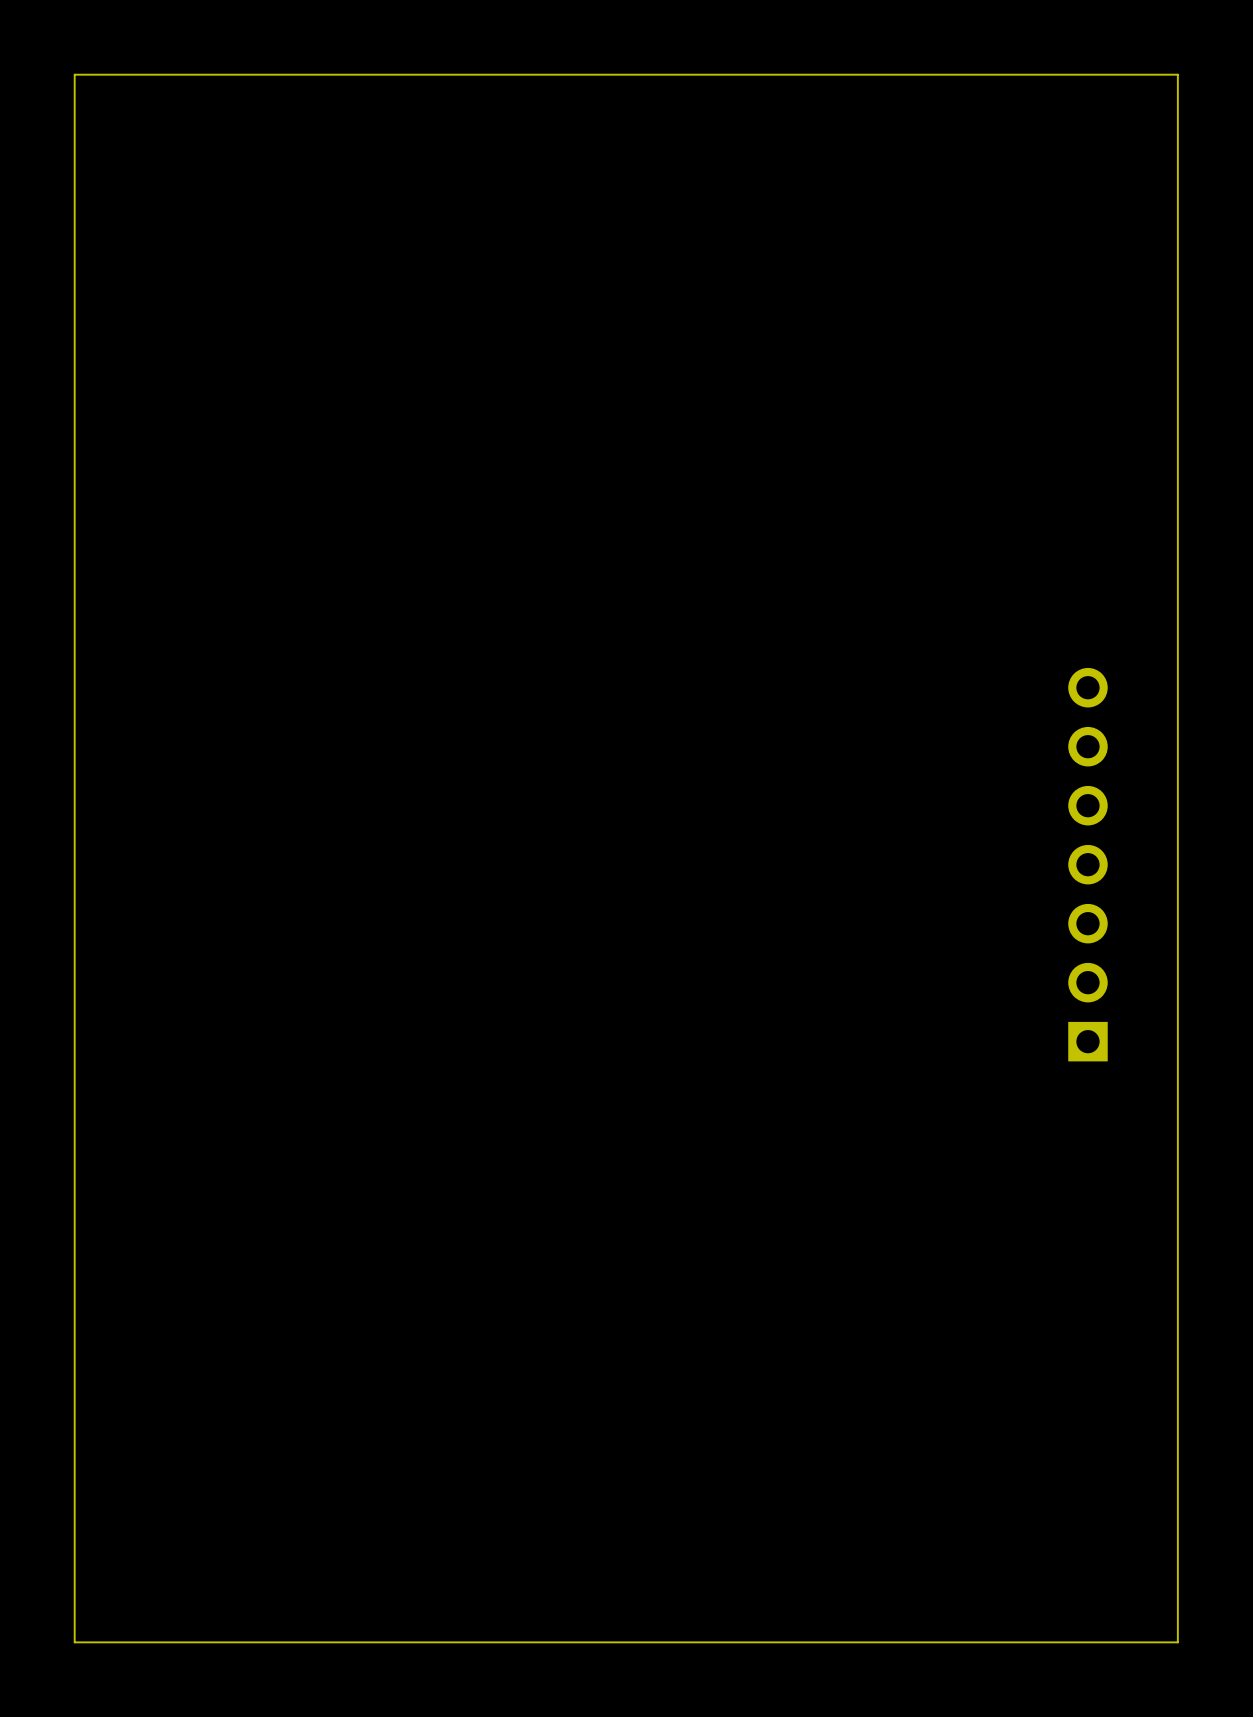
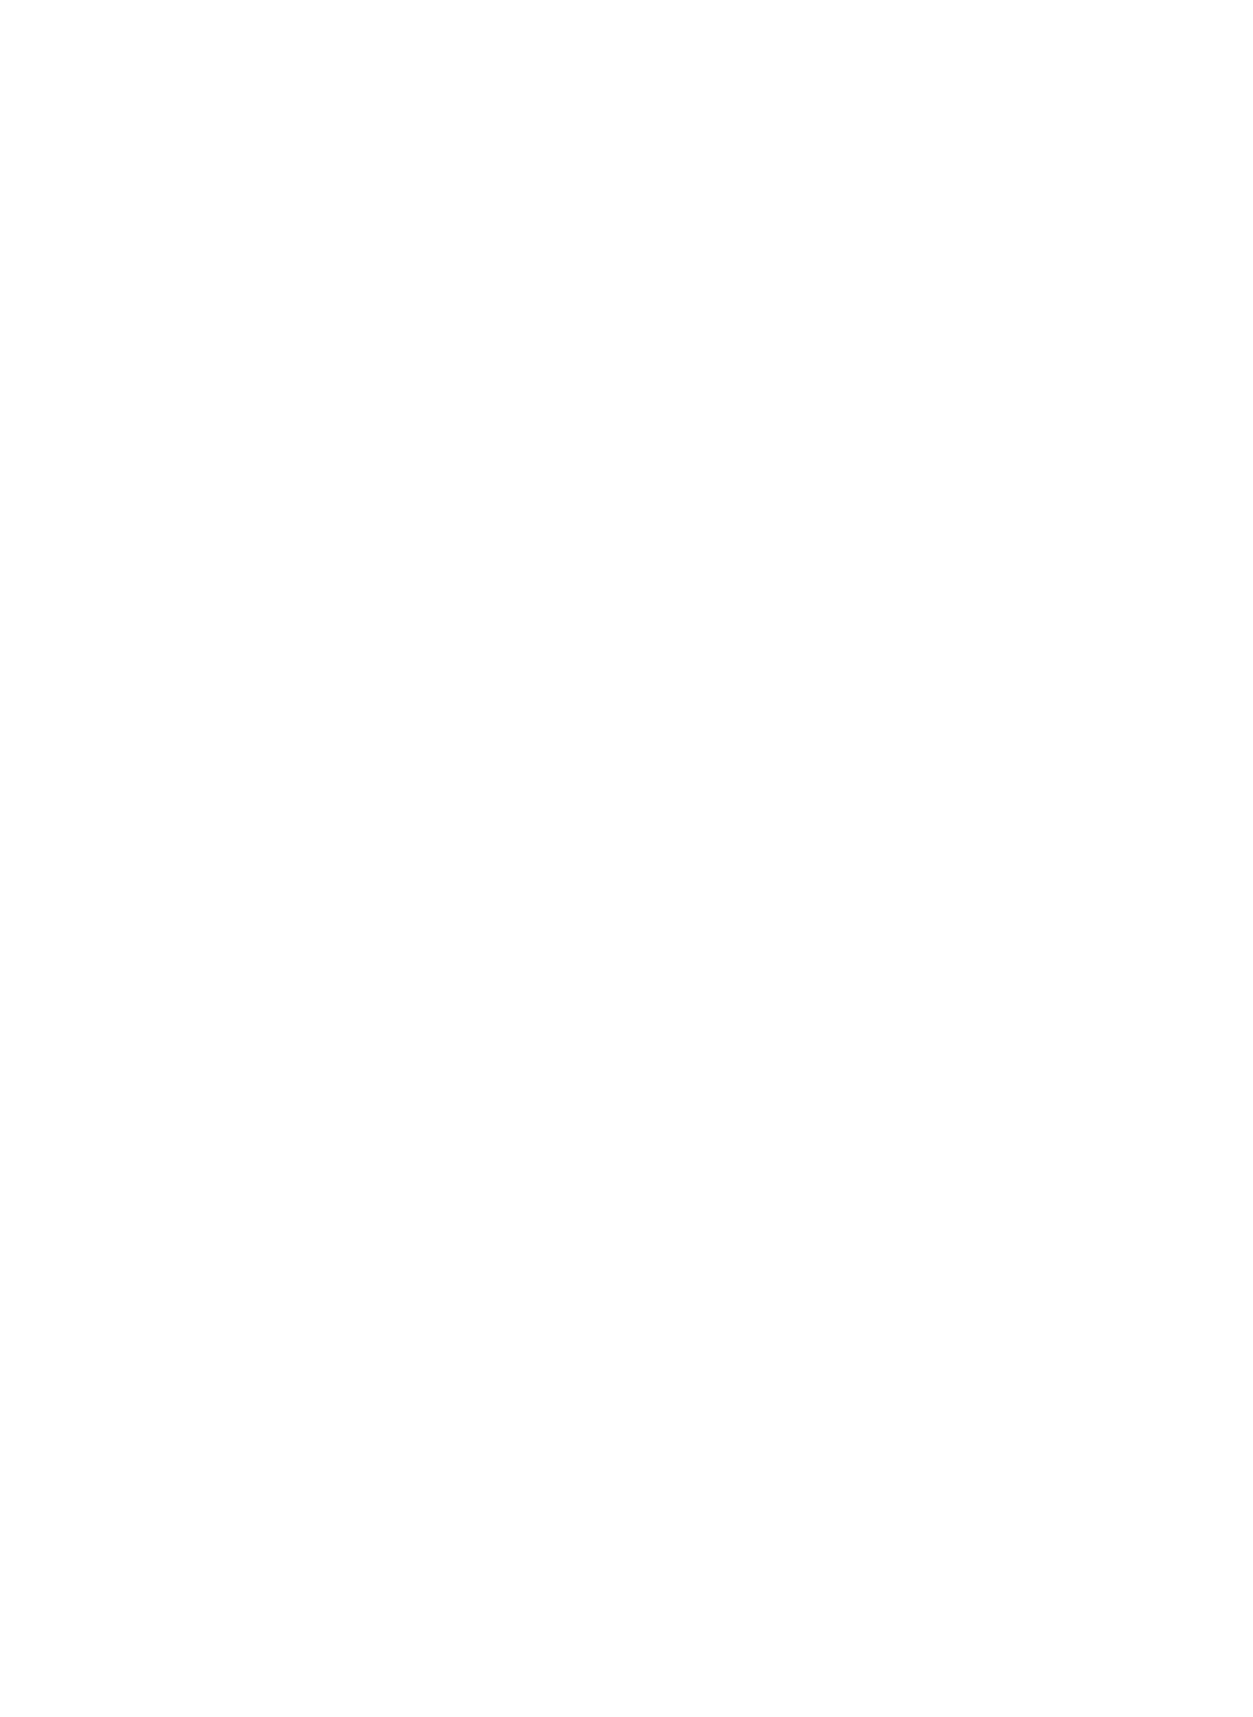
board edge: (1177, 74) (1177, 1642) (74, 1642) (74, 74) (1177, 74) -> none
part: (1087, 864) -> none

